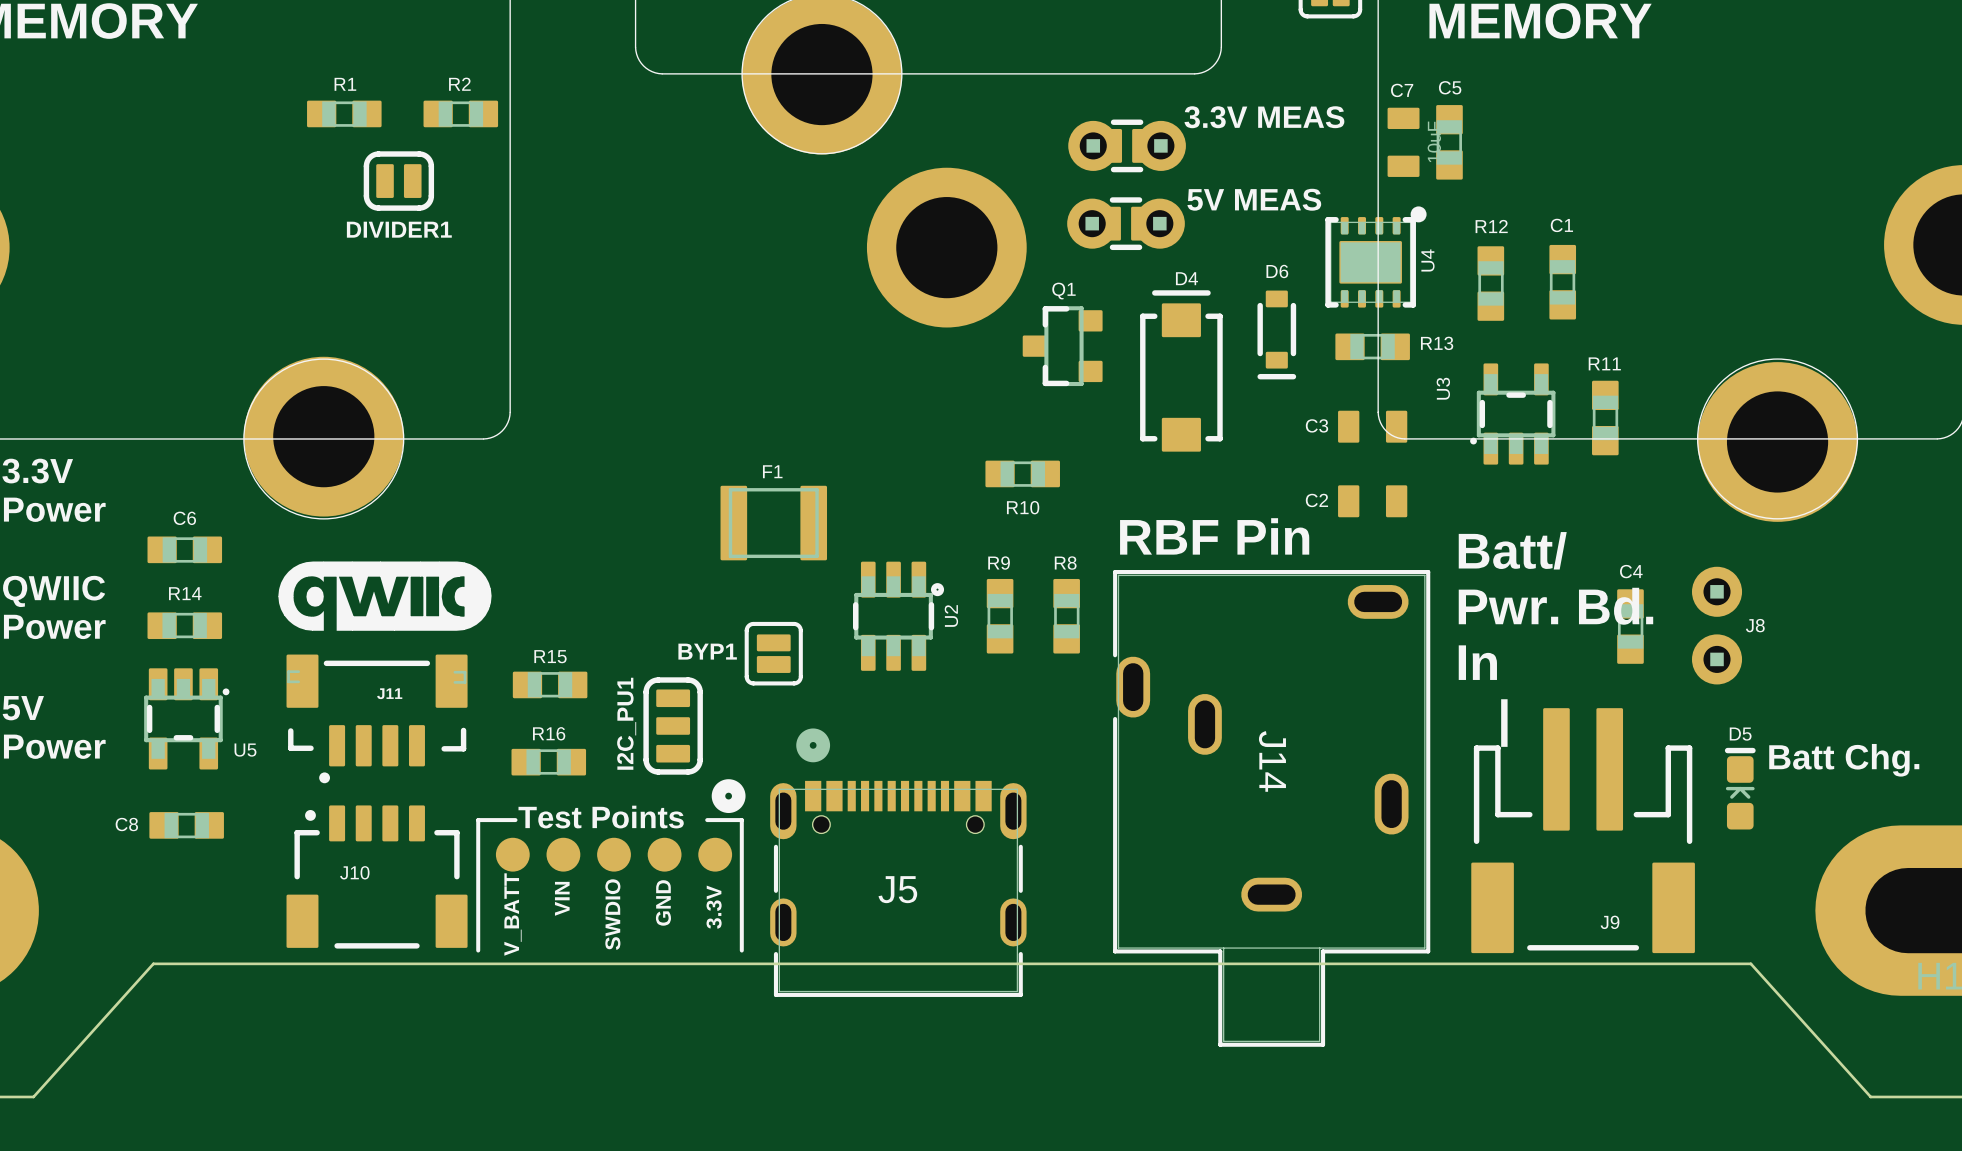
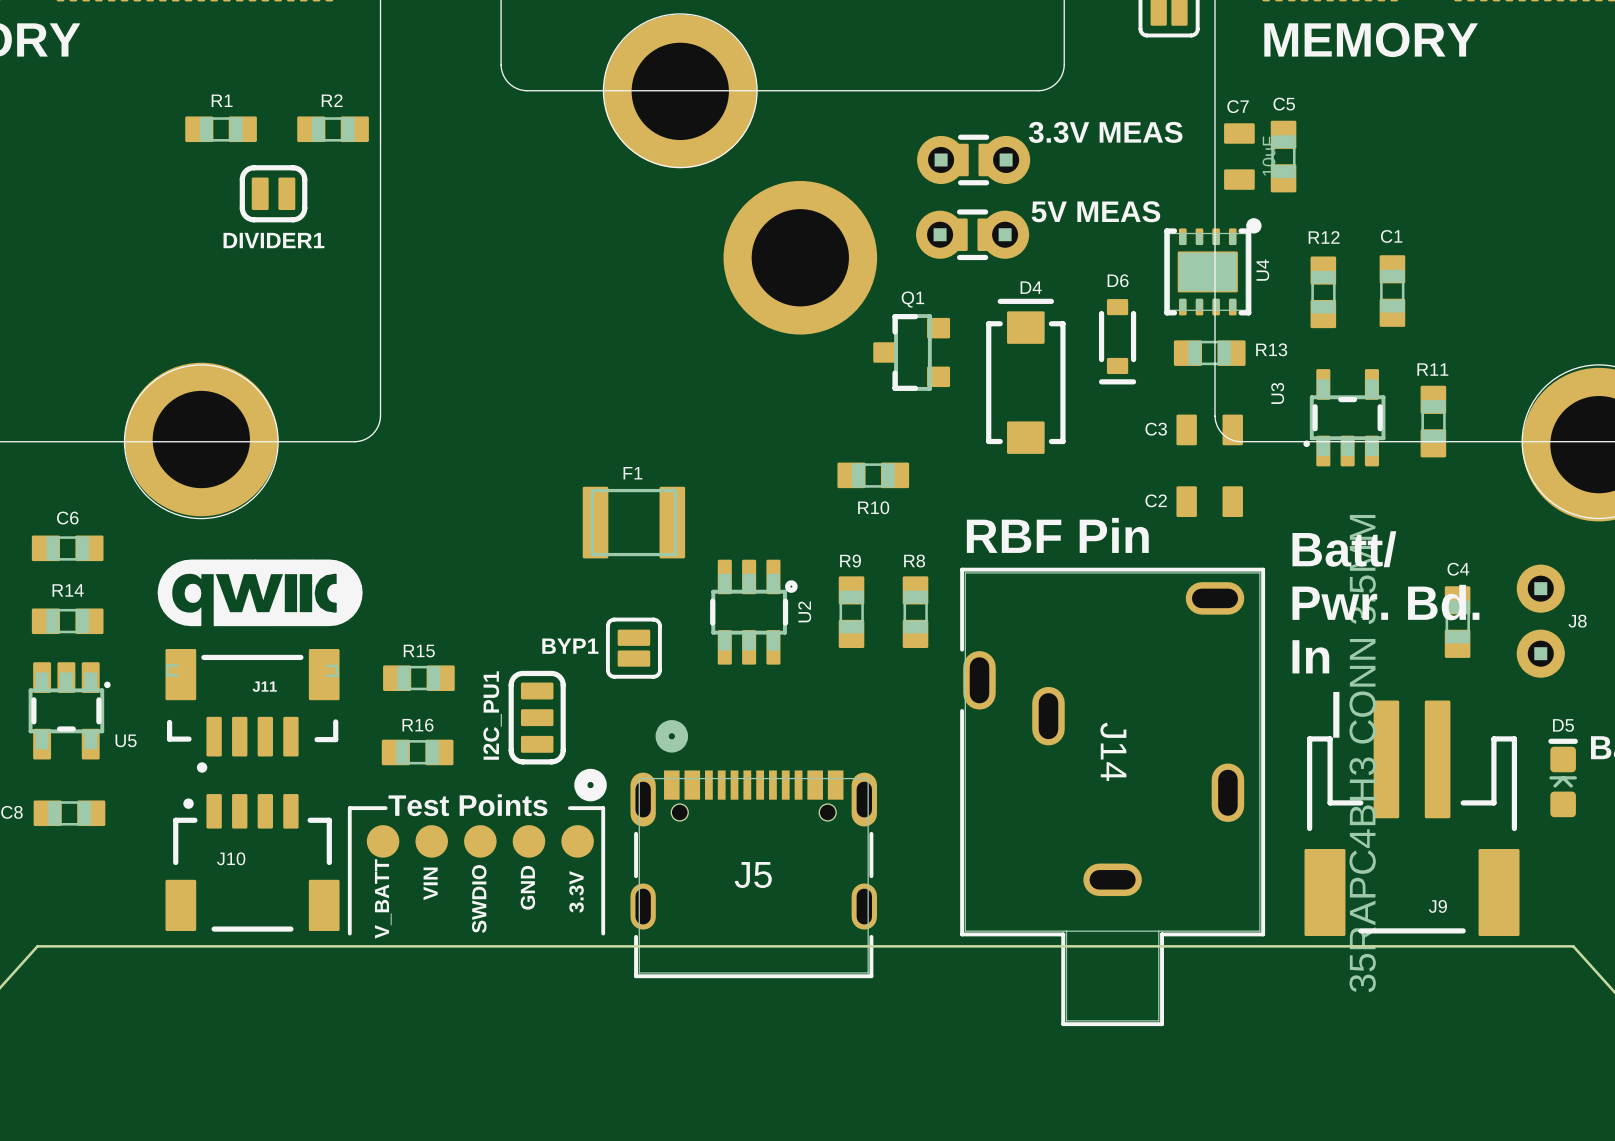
J14 value: none -> 35RAPC4BH3 CONN 3.5MM (1362, 753)

